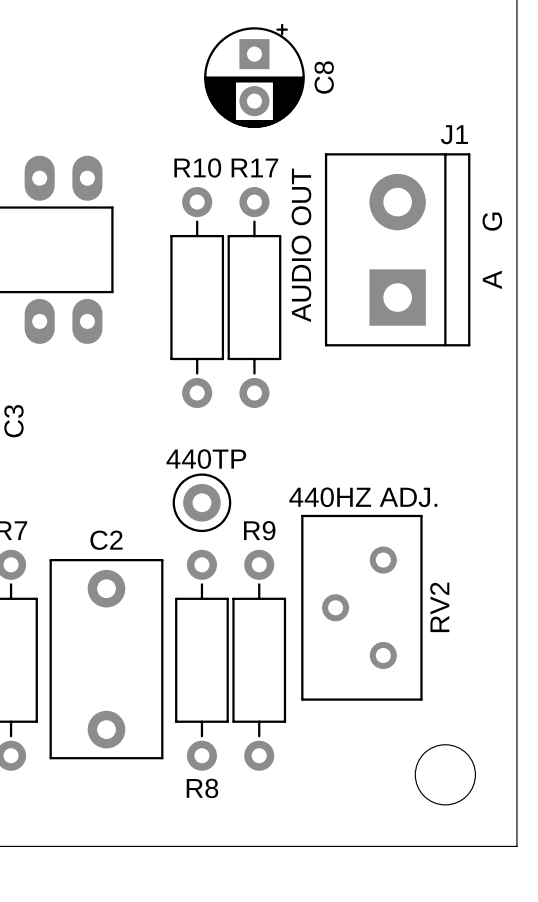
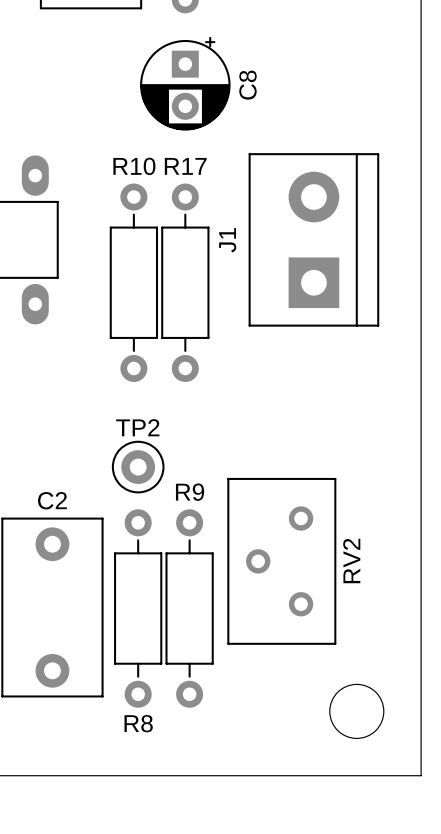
J1 name rotation: 0° (454, 134) -> 90° counterclockwise (227, 240)
J1 name position: J1 (454, 134) -> J1 (227, 240)
text: AUDIO OUT (301, 245) -> none
text: A G (492, 250) -> none
TP2 name: none -> TP2 (137, 427)
text: 440TP (206, 459) -> none
text: 440HZ ADJ. (363, 497) -> none

